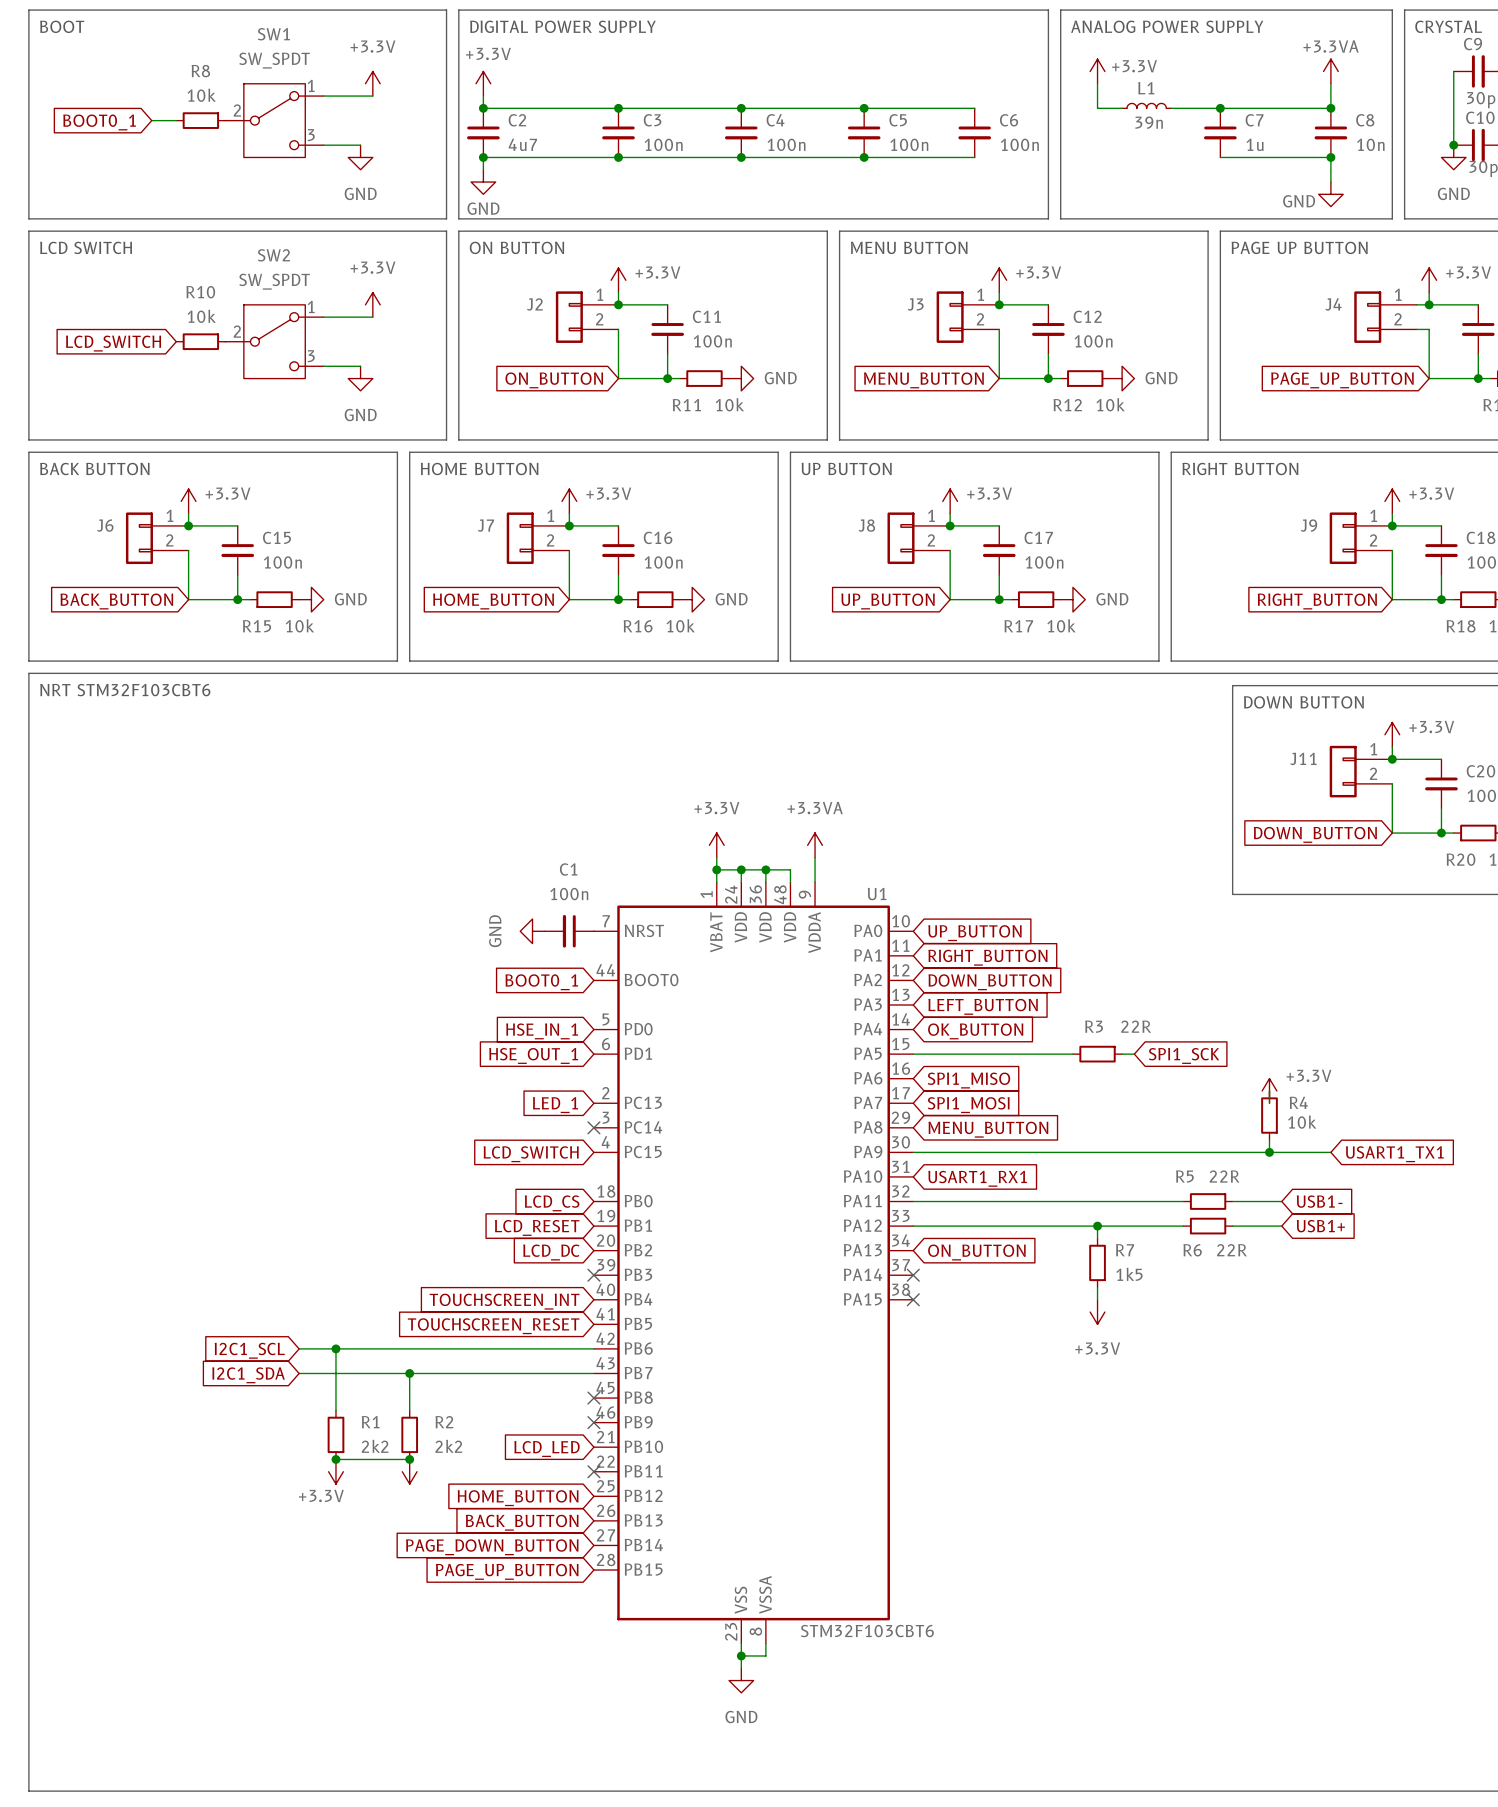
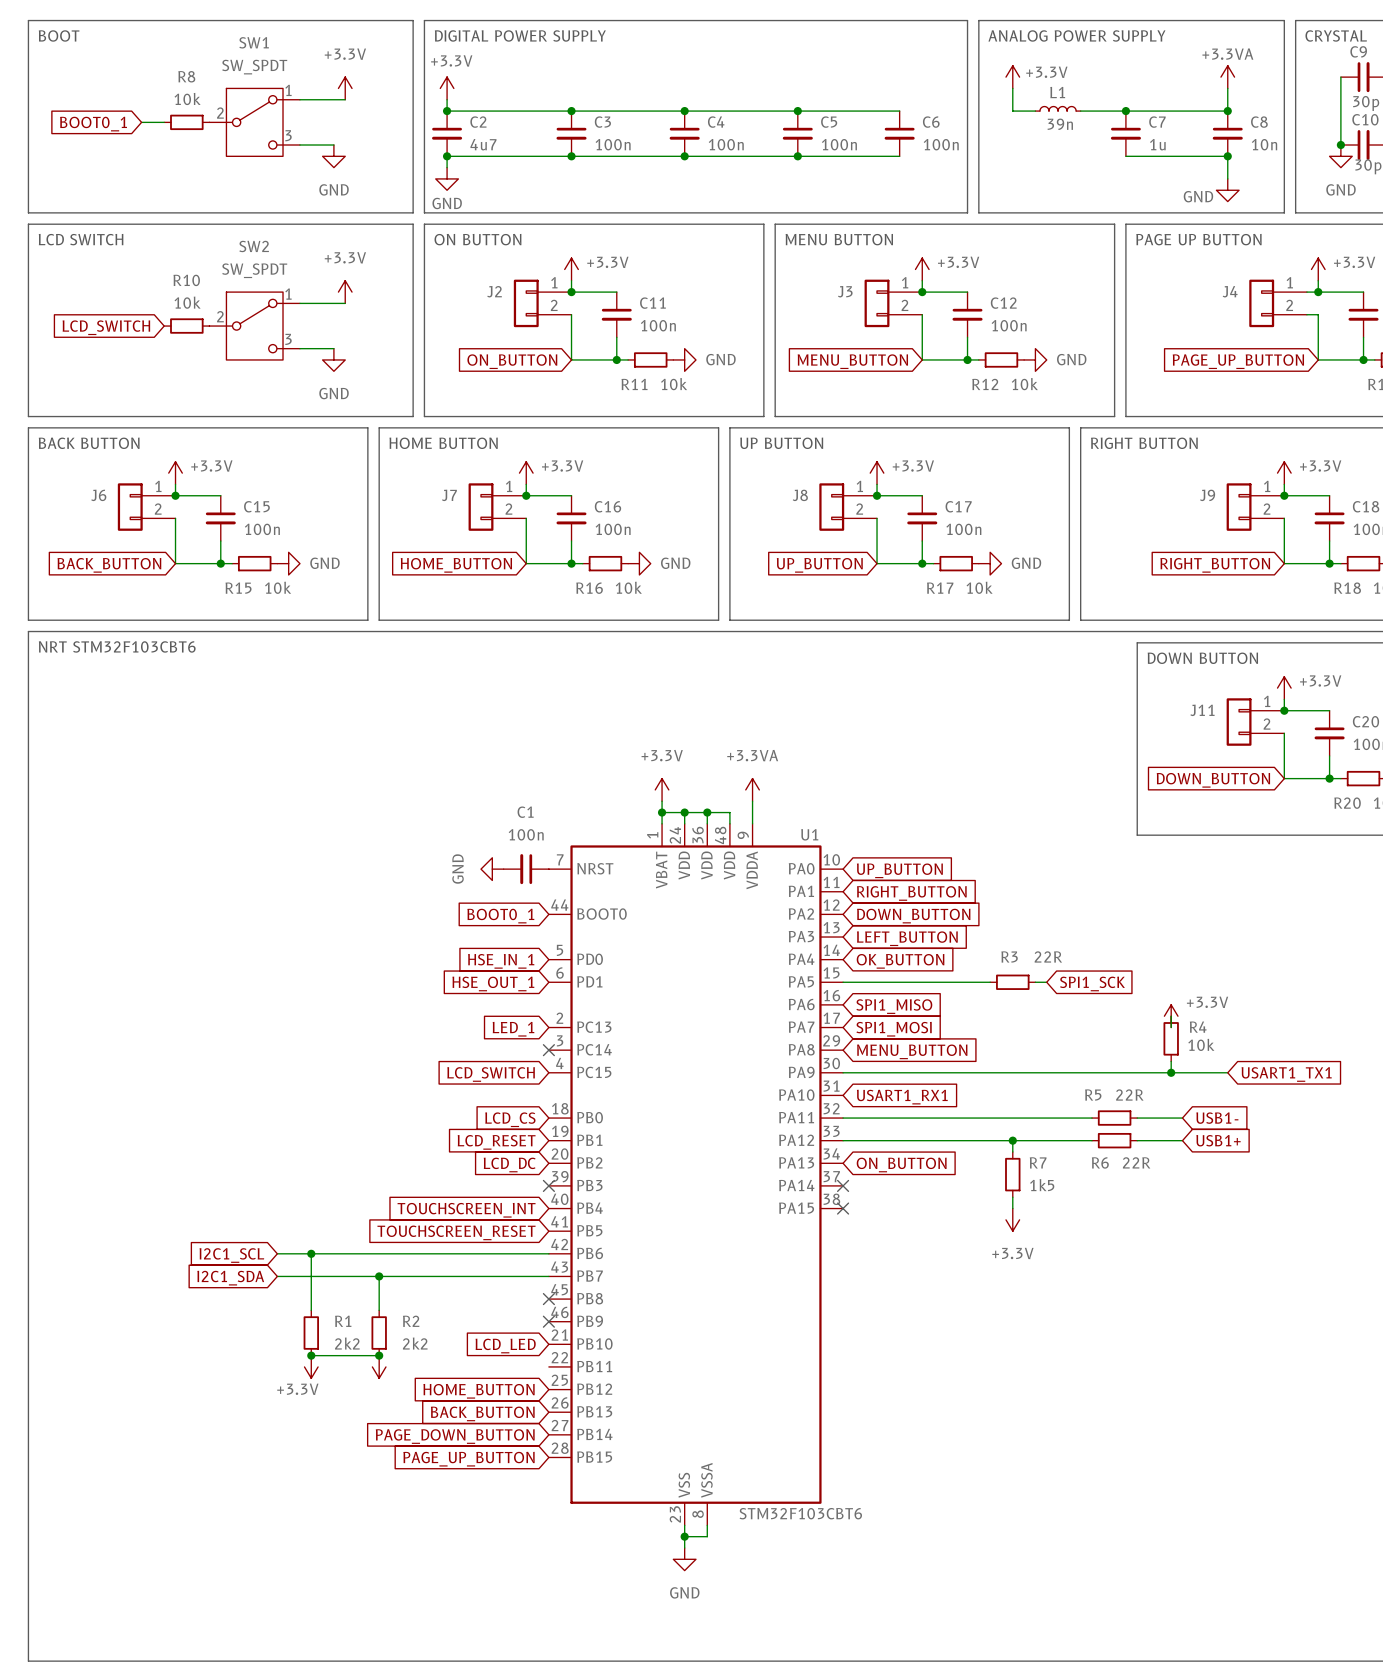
no-connect mark: (593, 1471) -> none

